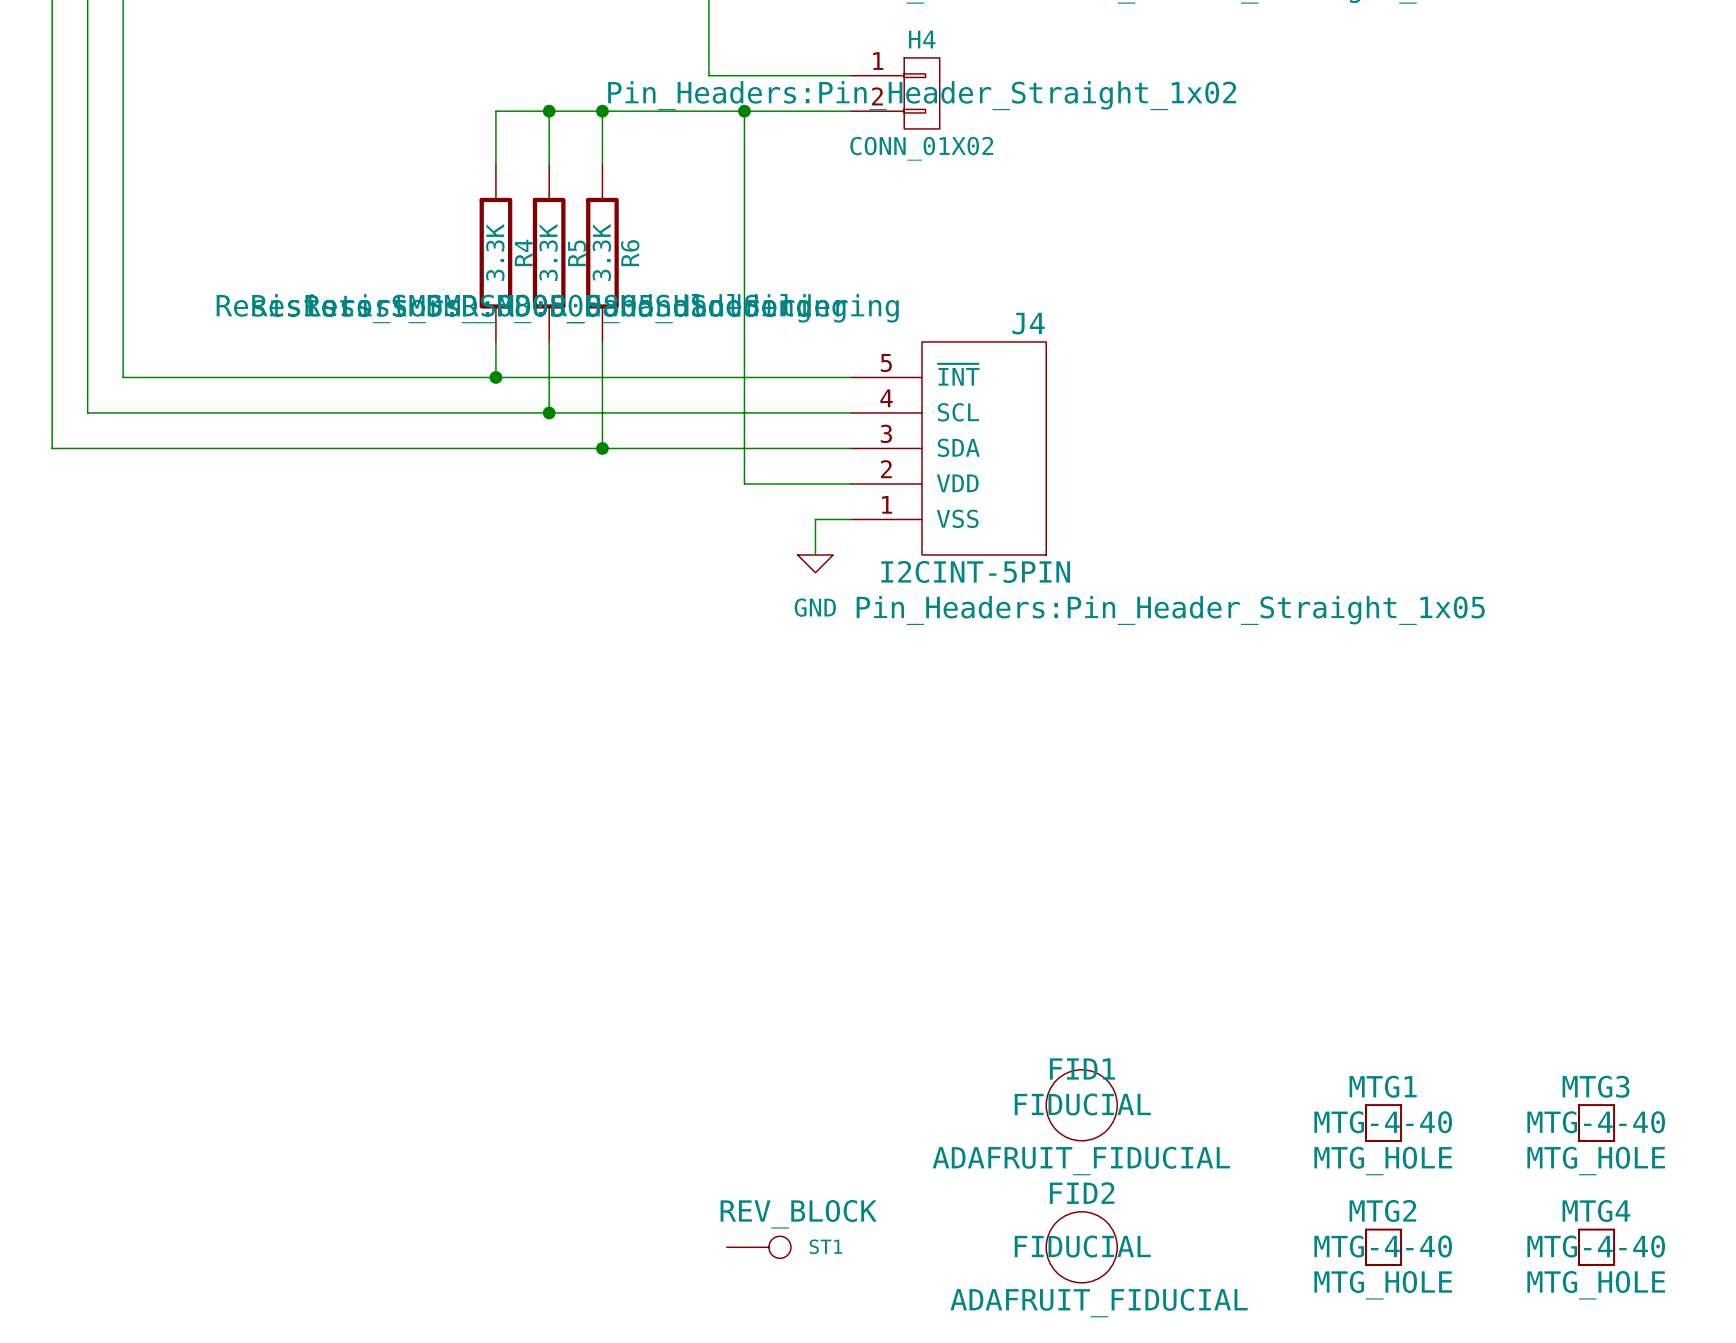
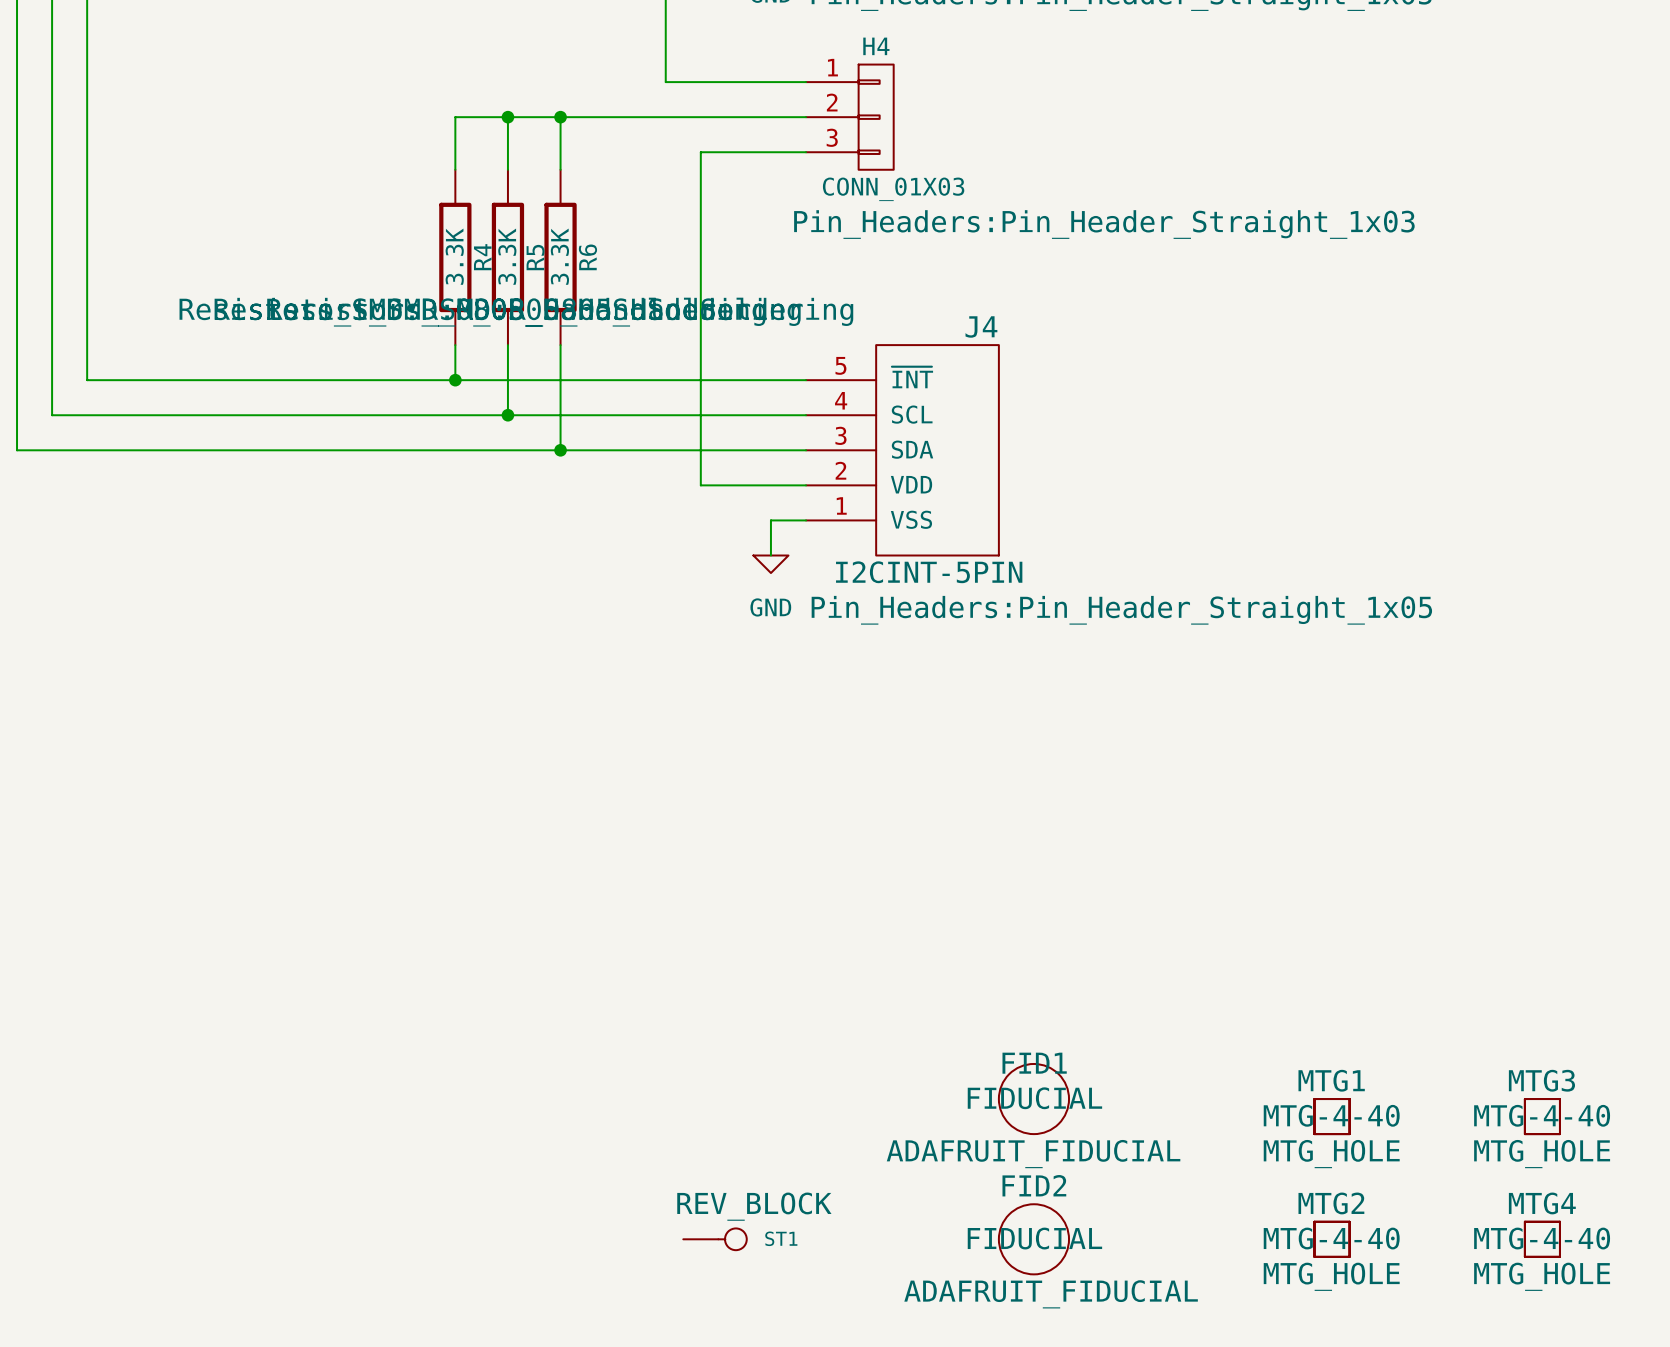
H4 symbol: [850, 57, 940, 129] -> [806, 64, 894, 170]
H4 text: Pin_Headers:Pin_Header_Straight_1x02 (922, 95) -> Pin_Headers:Pin_Header_Straight_1x03 (1104, 224)
wire: (744, 111) (744, 146) -> (806, 152) (700, 152)
junction: (744, 111) -> none
H4 value: CONN_01X02 (921, 148) -> CONN_01X03 (893, 189)

